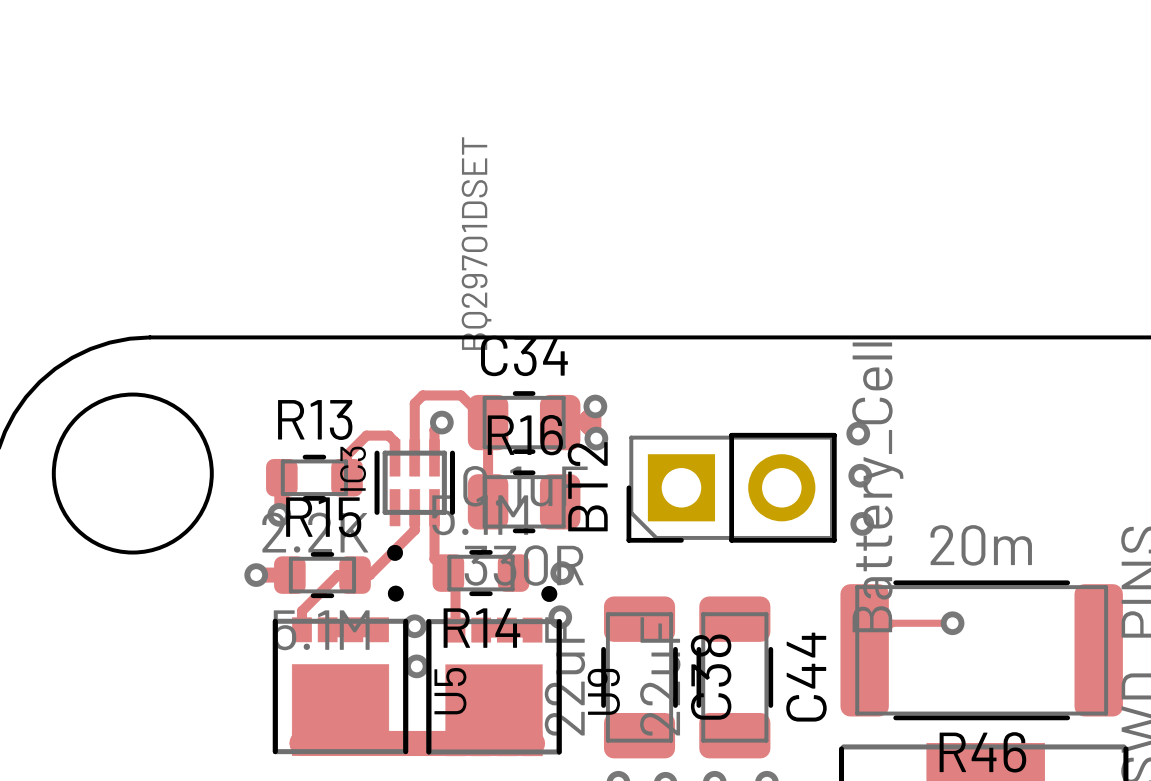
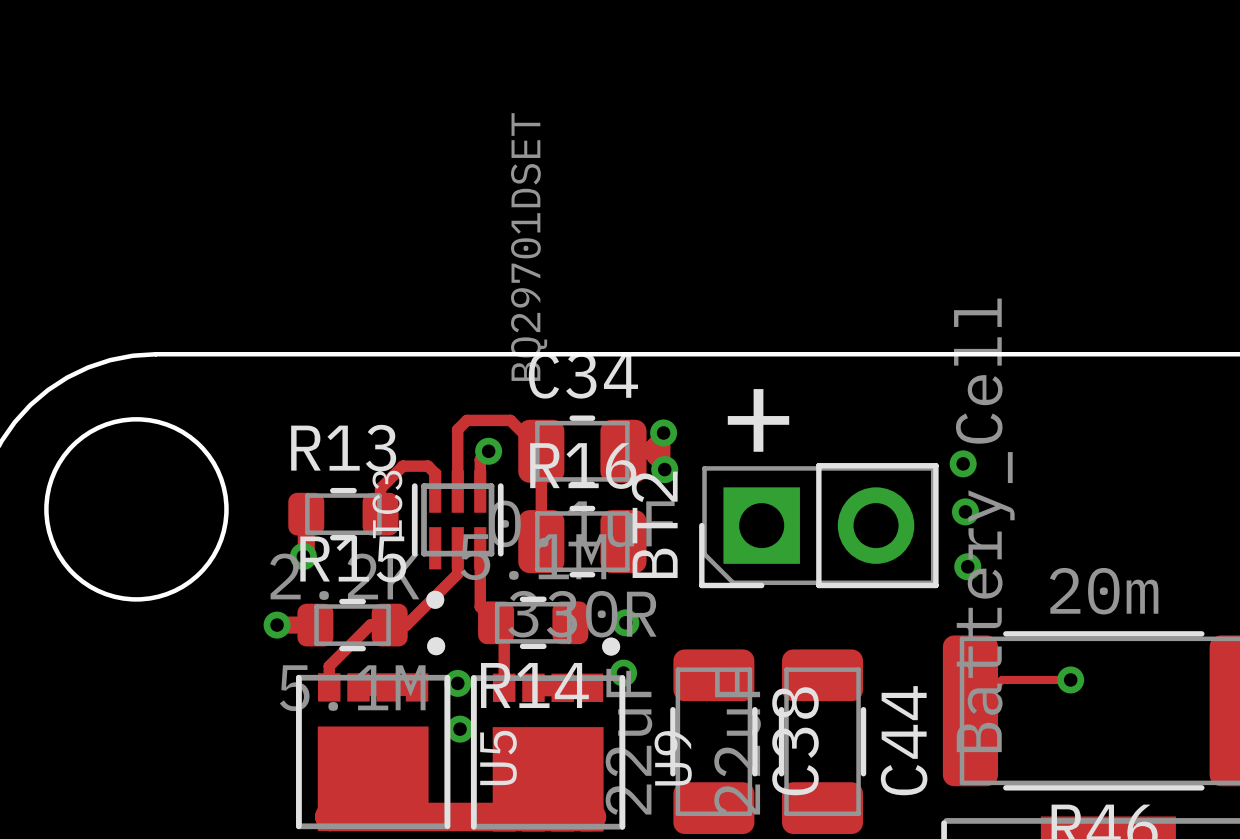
text: none -> + (758, 420)

